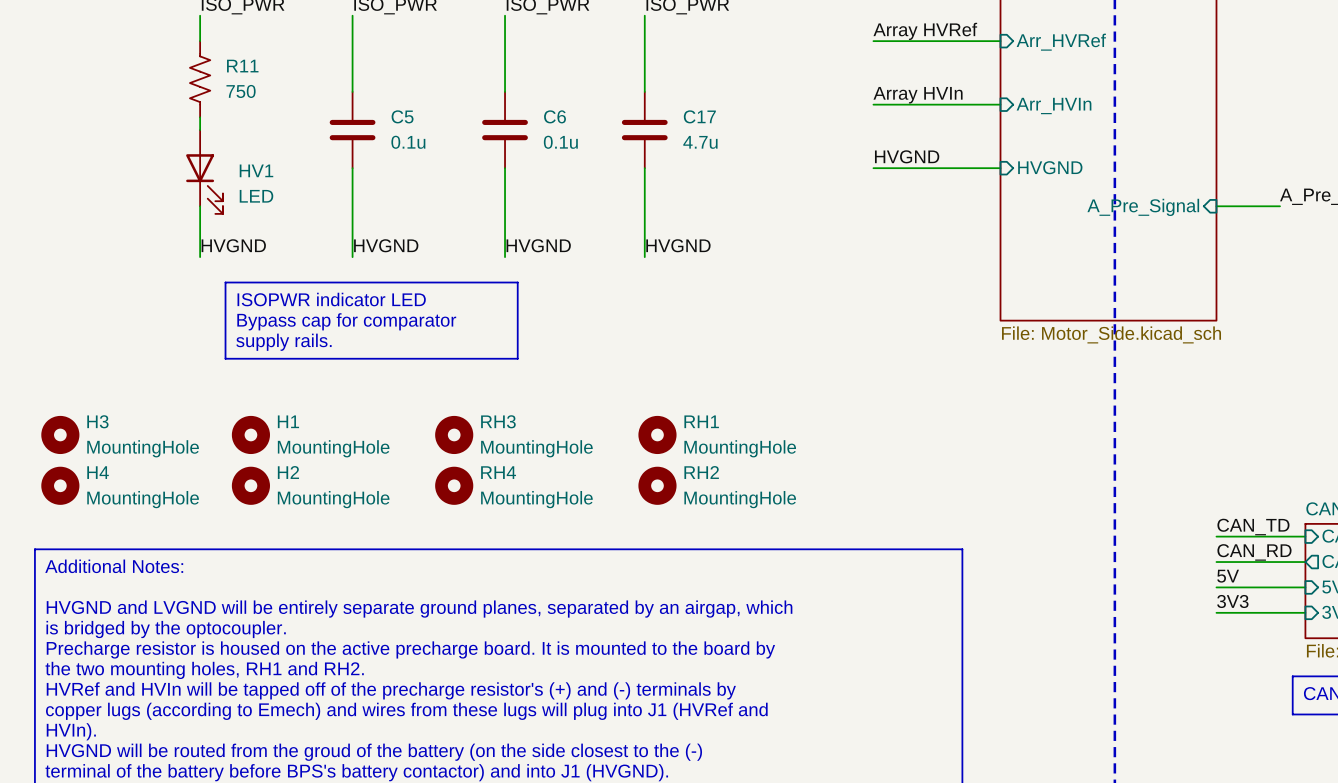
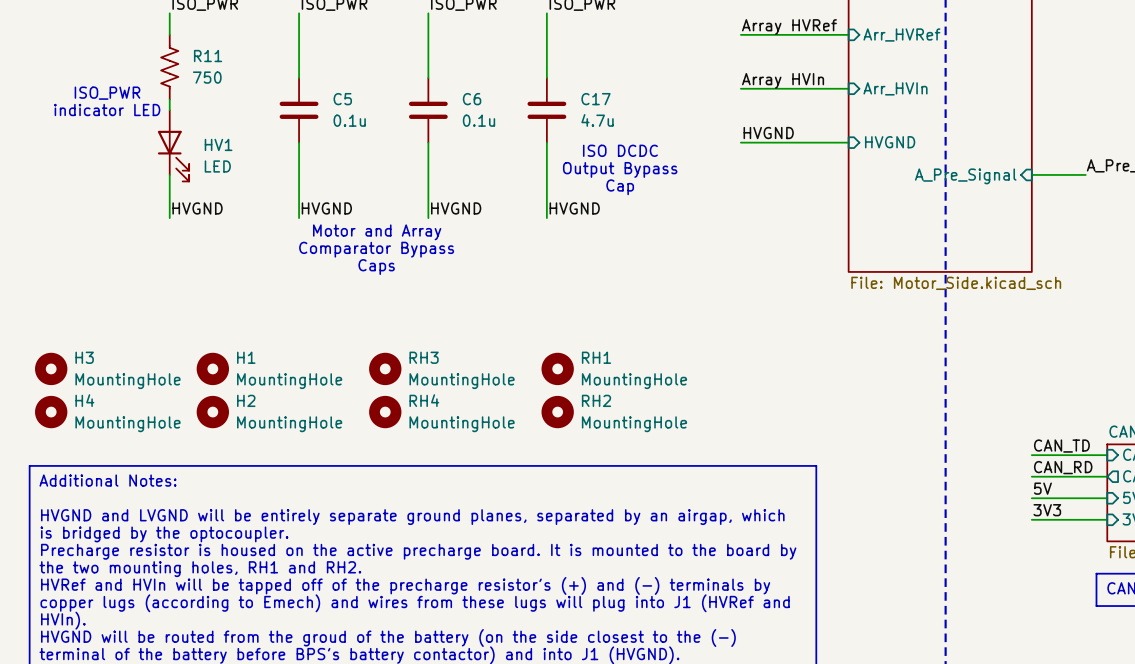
text: none -> ISO_PWR (107, 93)
text: none -> indicator LED (107, 110)
text: none -> ISO DCDC (620, 150)
text: none -> Output Bypass (620, 169)
text: none -> Cap (620, 187)
text: none -> Motor and Array (377, 232)
line: (225, 282) (517, 282) (517, 358) (225, 358) (225, 282) -> none
text: none -> Comparator Bypass (376, 249)
text: ISOPWR indicator LED (331, 299) -> none
text: none -> Caps (376, 267)
text: Bypass cap for comparator (346, 321) -> none
text: supply rails. (283, 342) -> none

